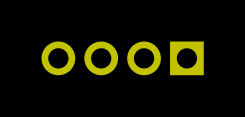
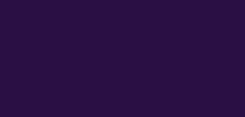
part: (122, 58) -> none

